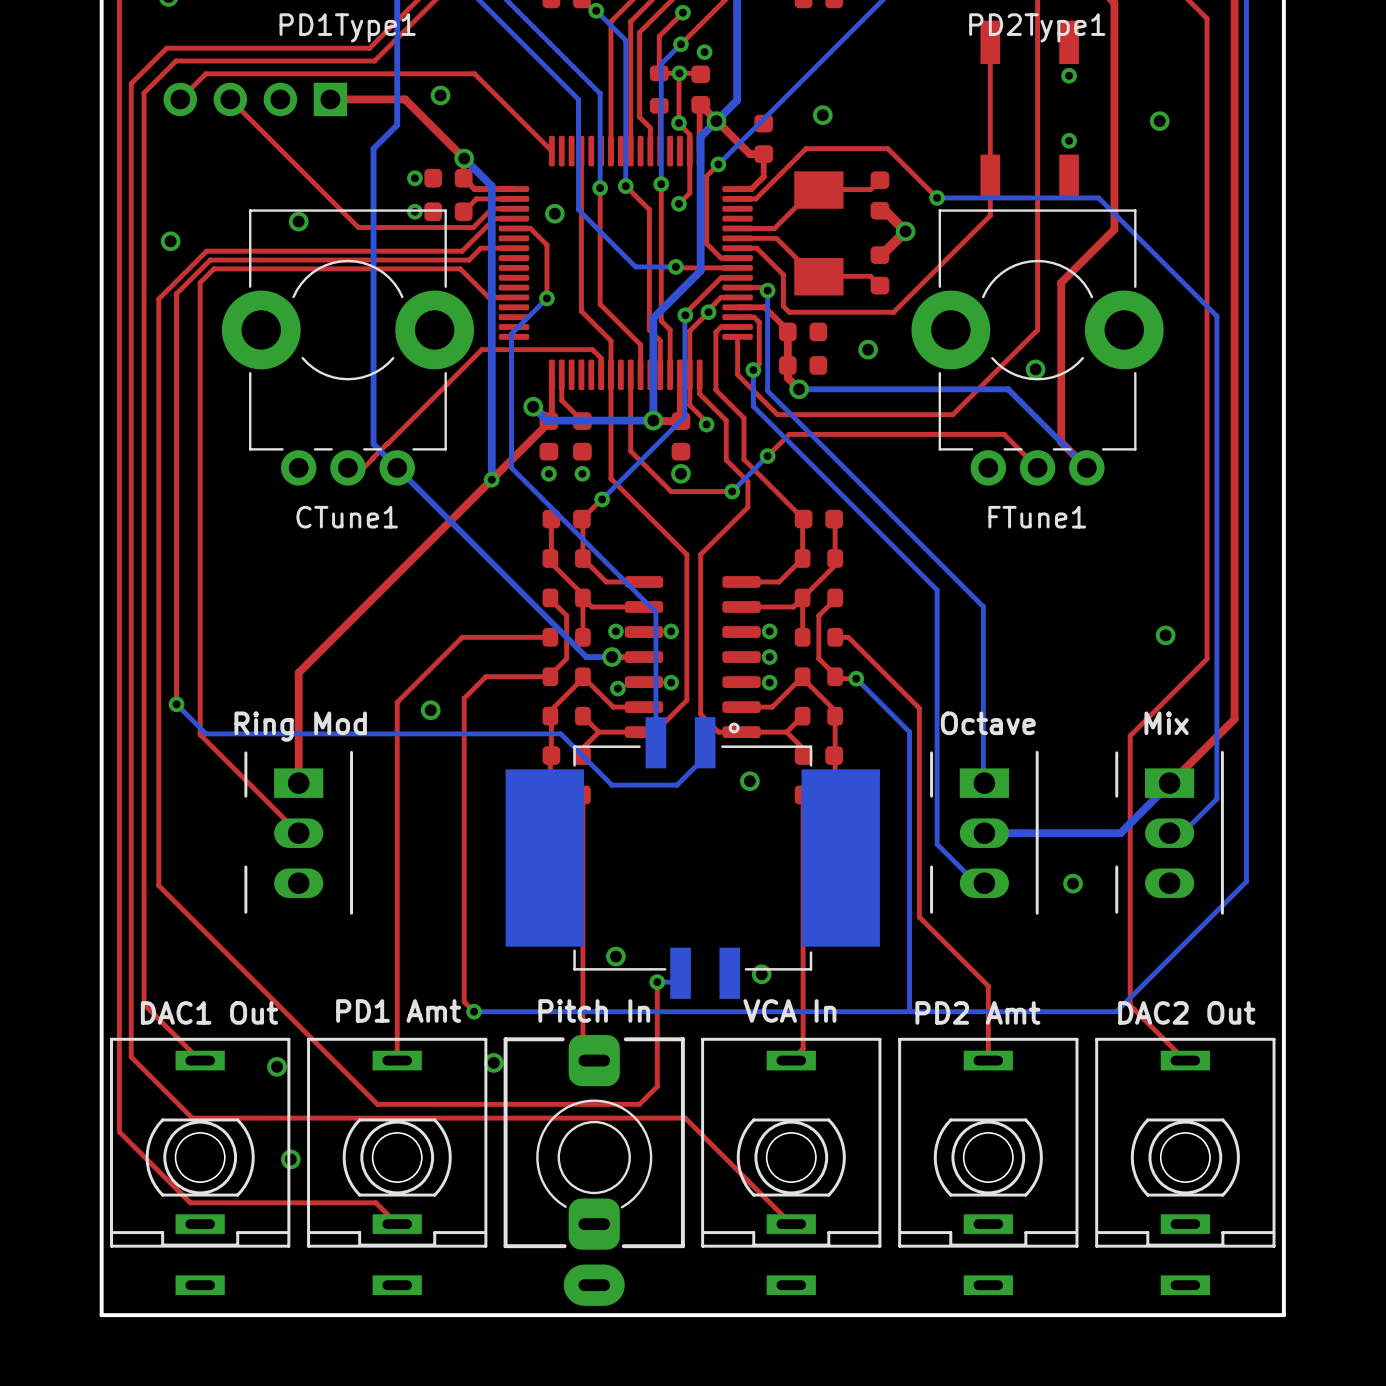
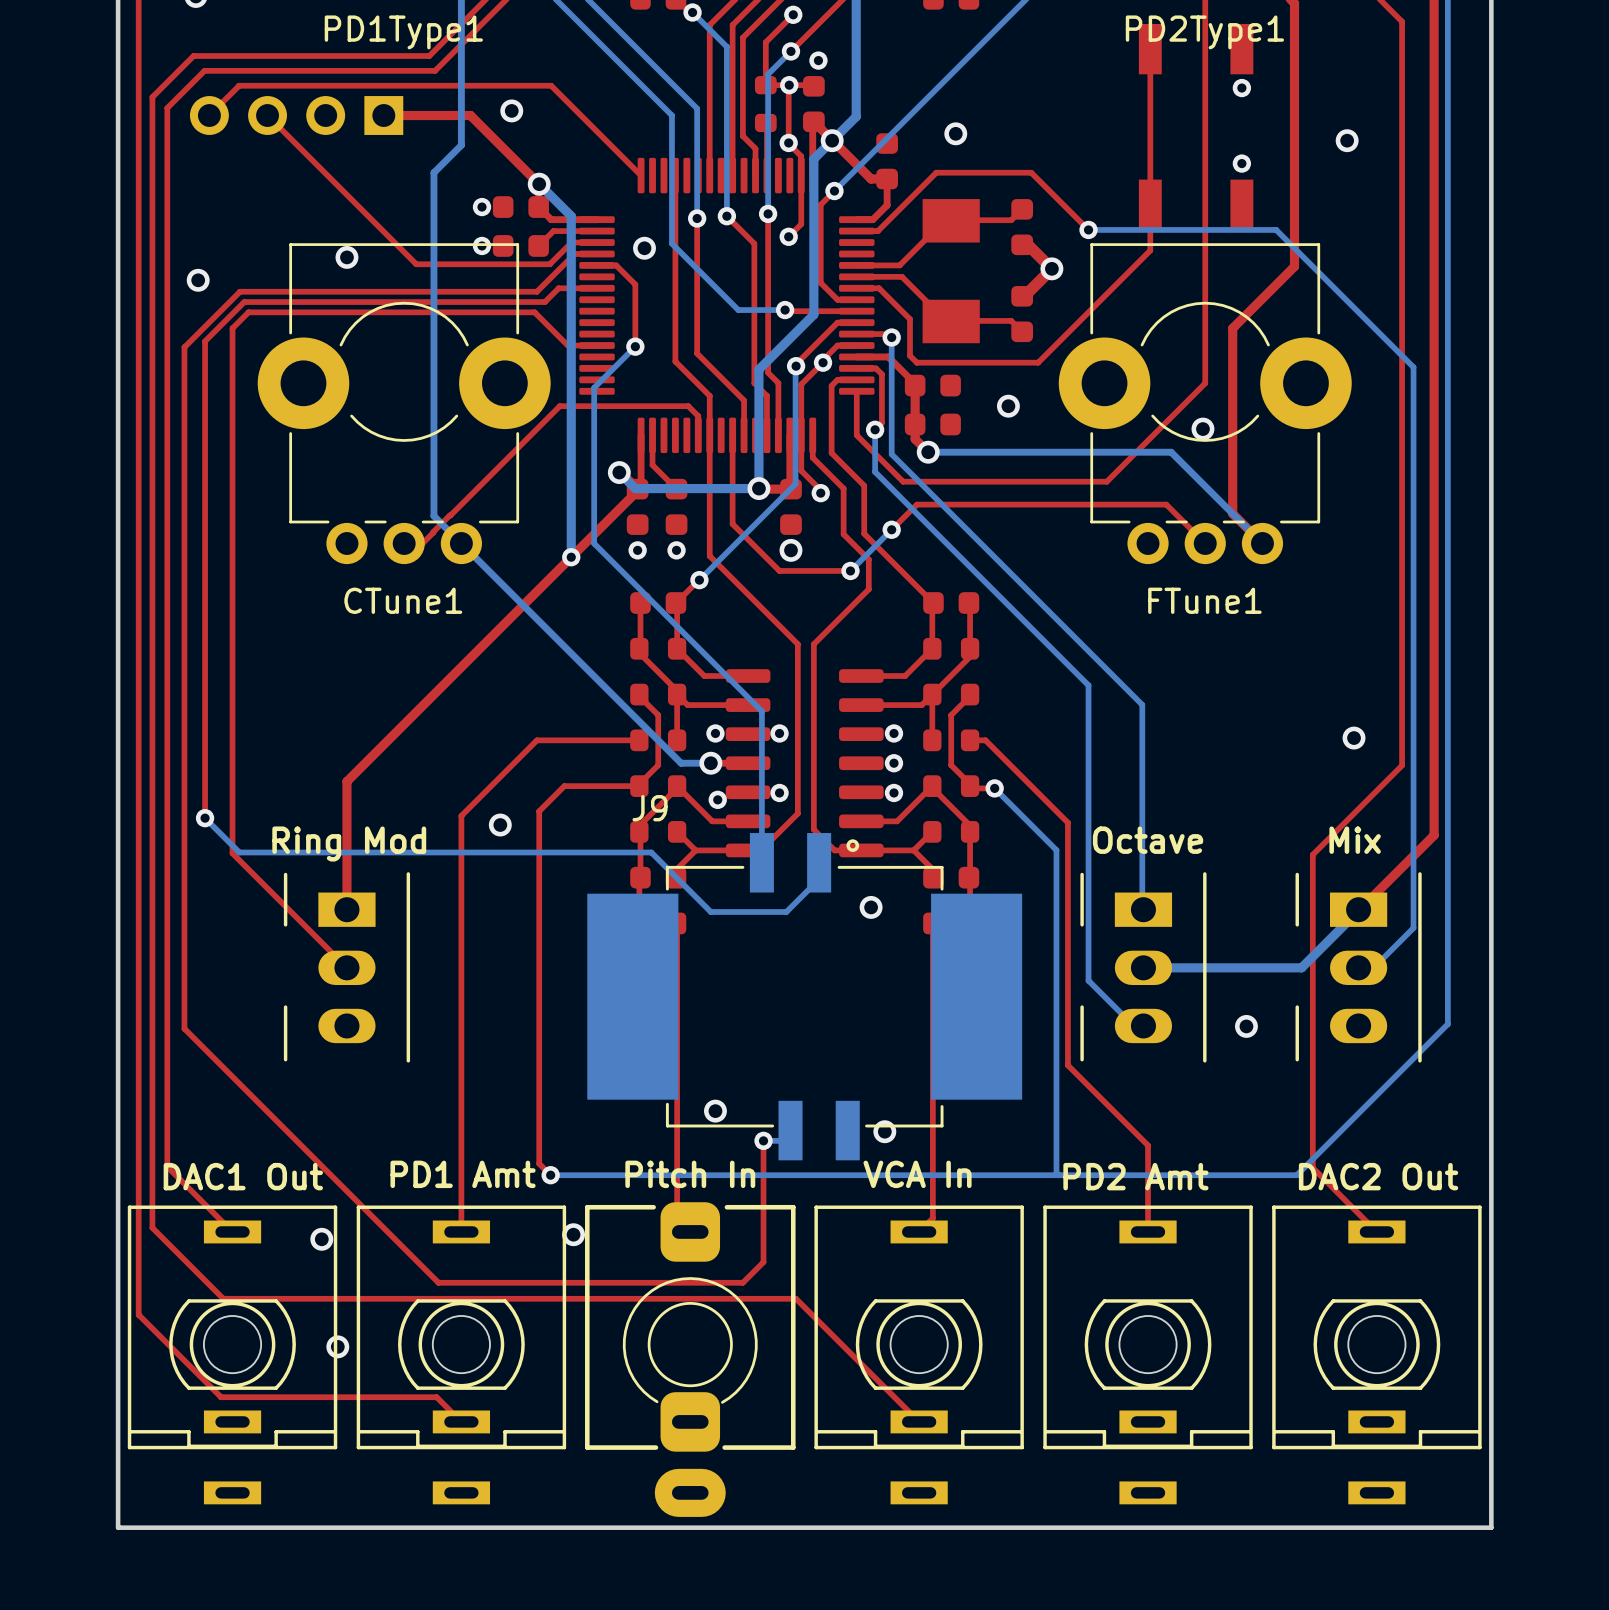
J9 name: none -> J9 (650, 808)

